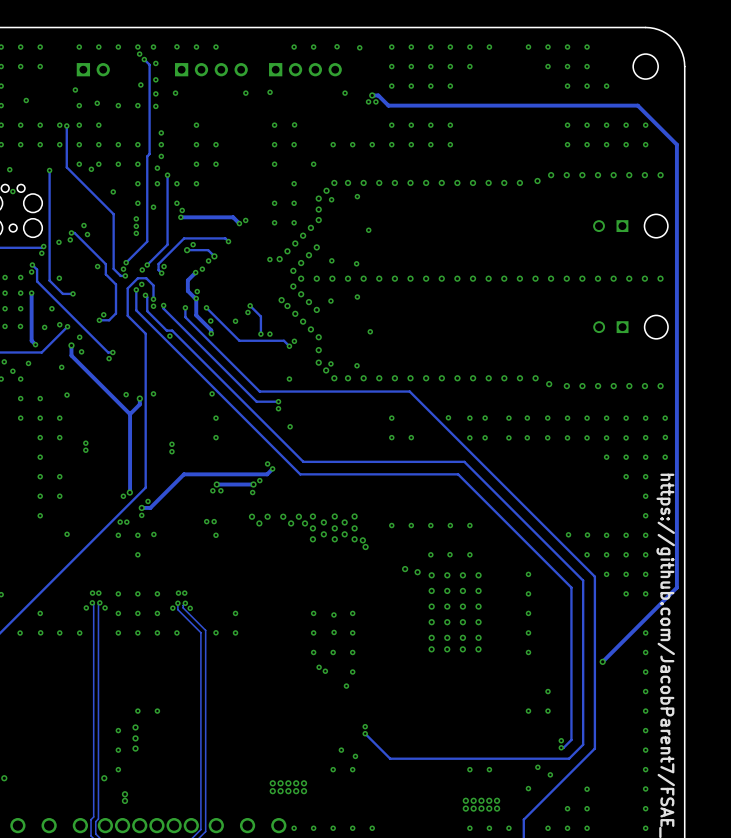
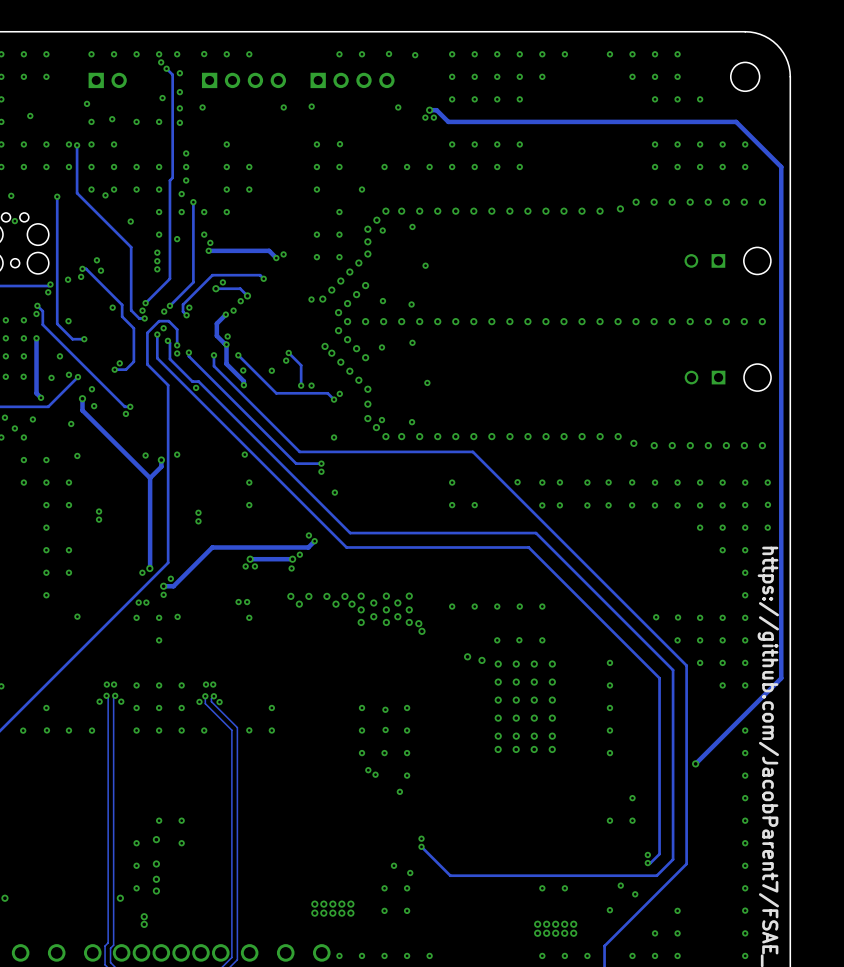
via: none -> (181, 843)
via: (135, 738) -> none
via: none -> (156, 879)
via: none -> (156, 891)
via: none -> (384, 910)
via: none -> (407, 910)

